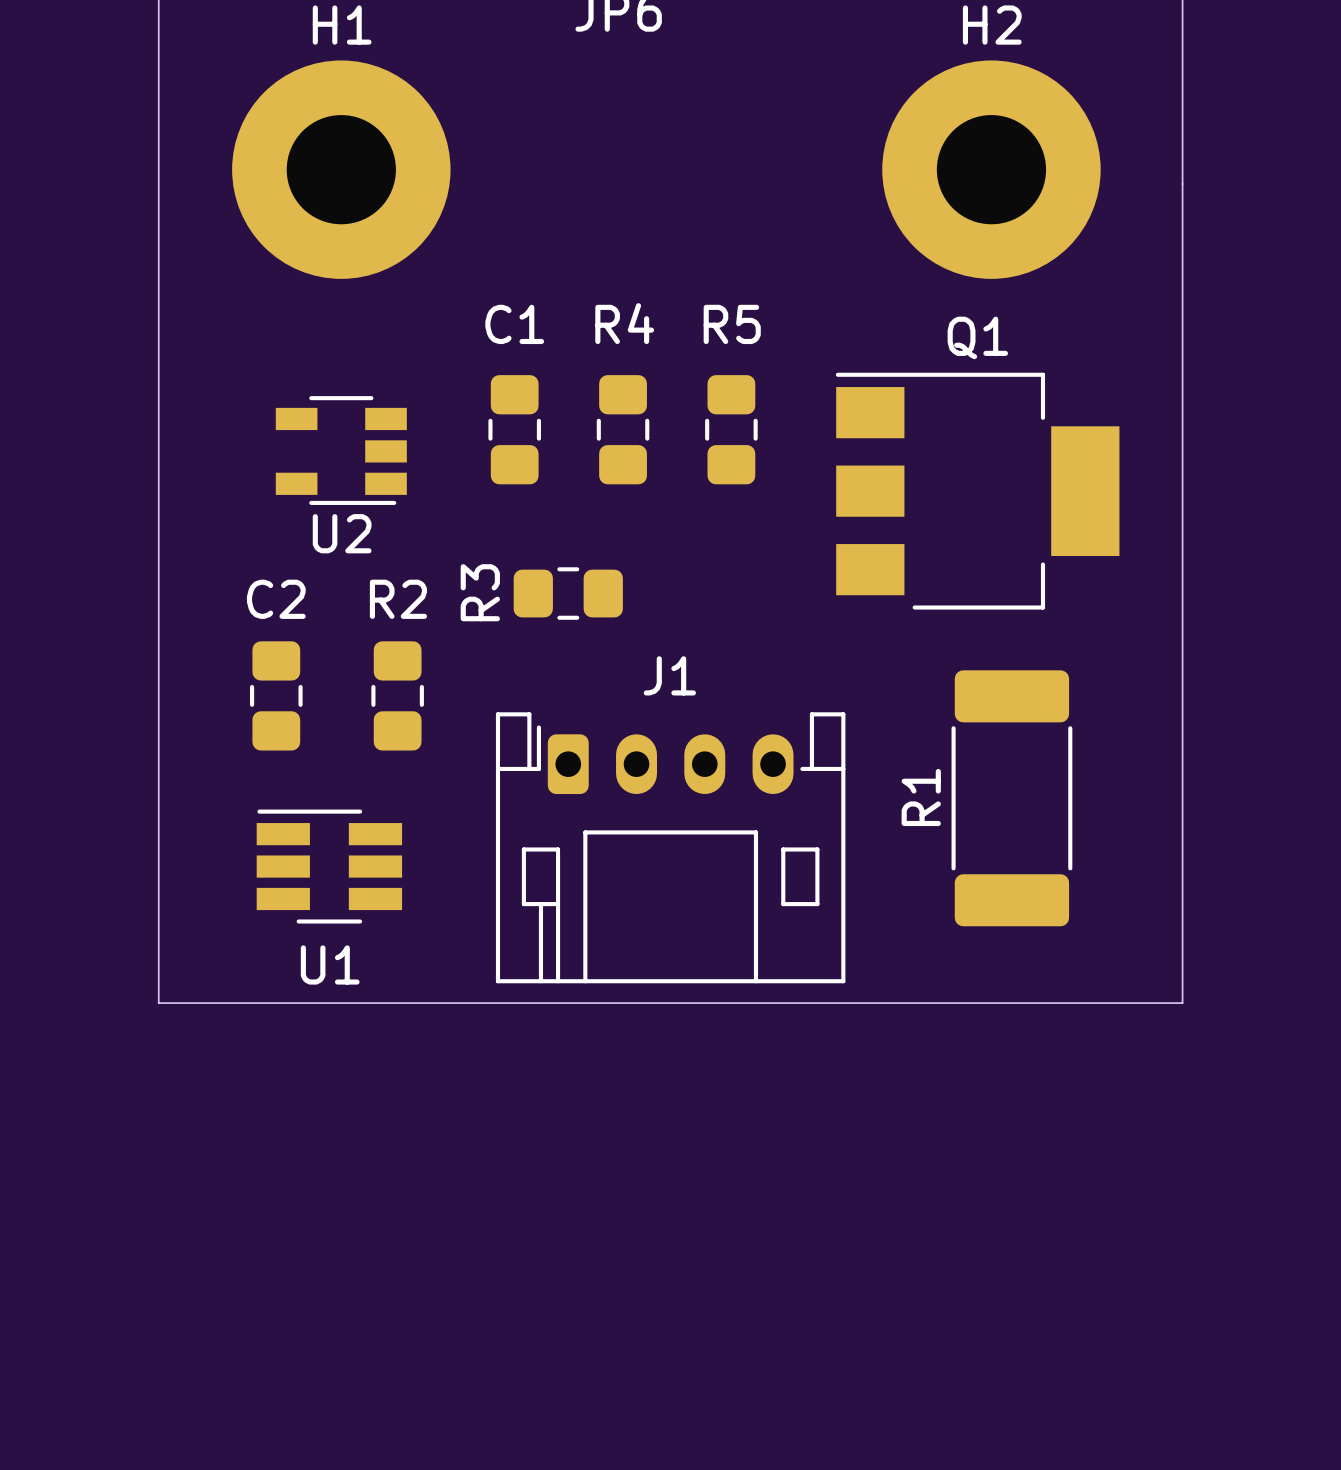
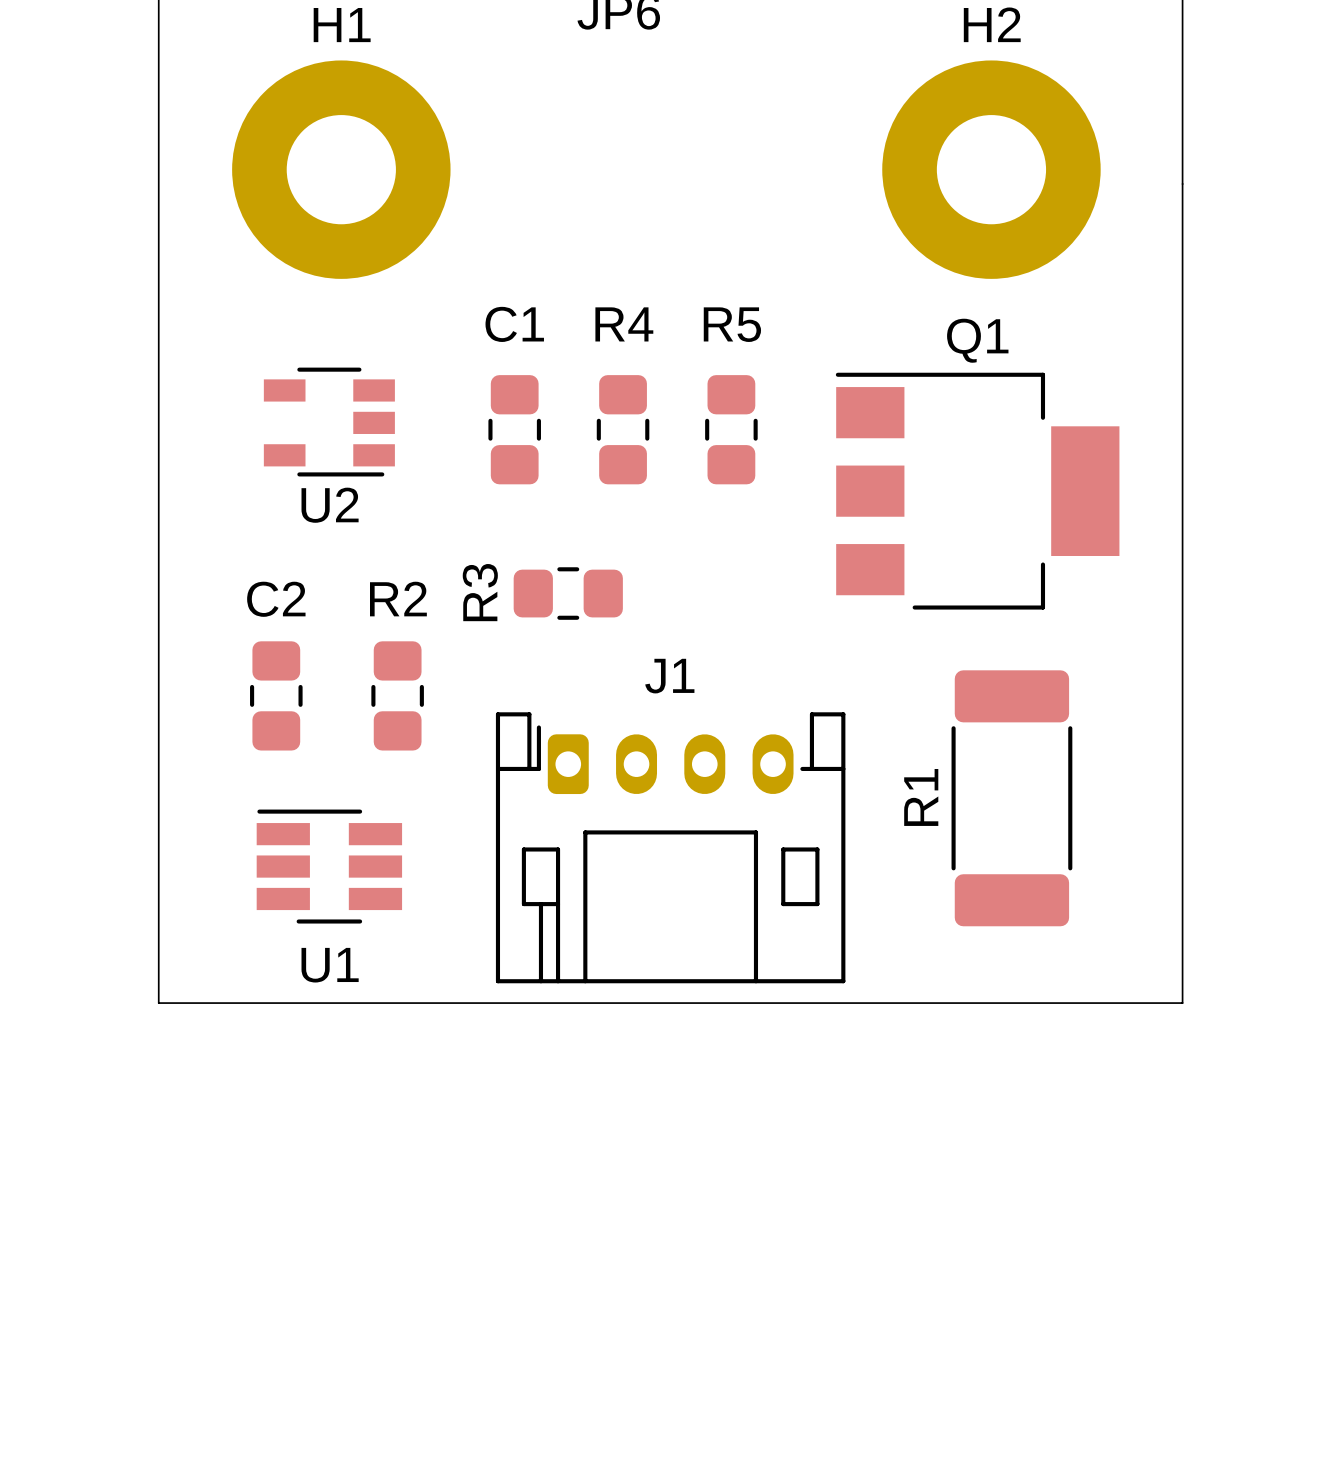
U2 position: (341, 450) -> (329, 422)

